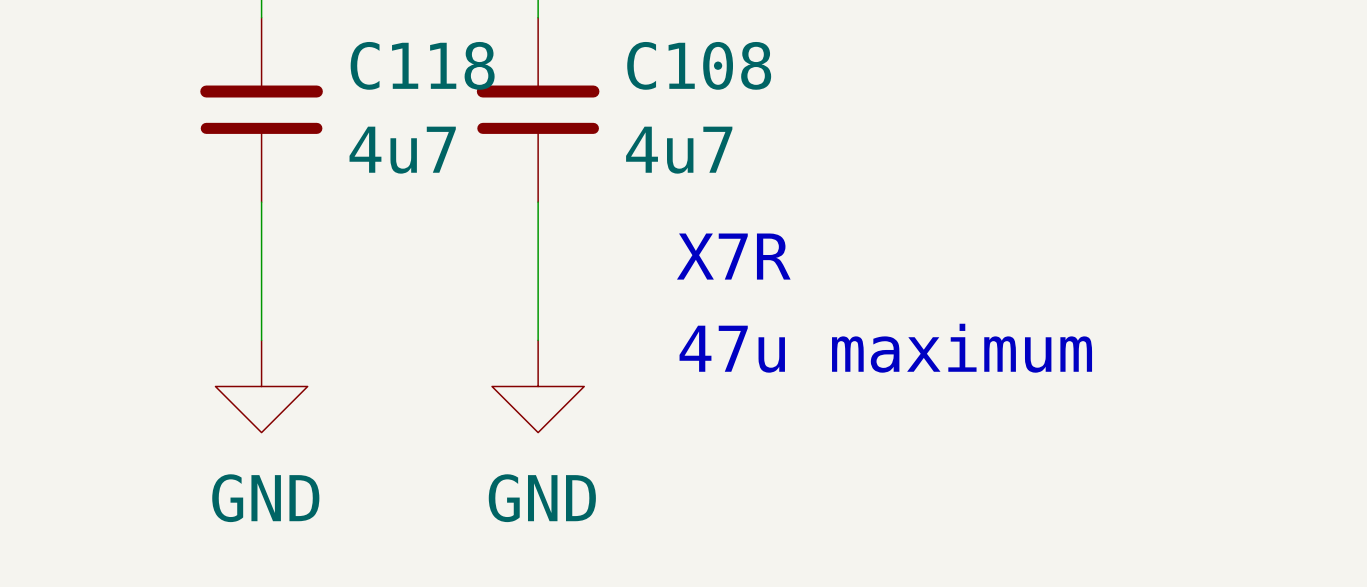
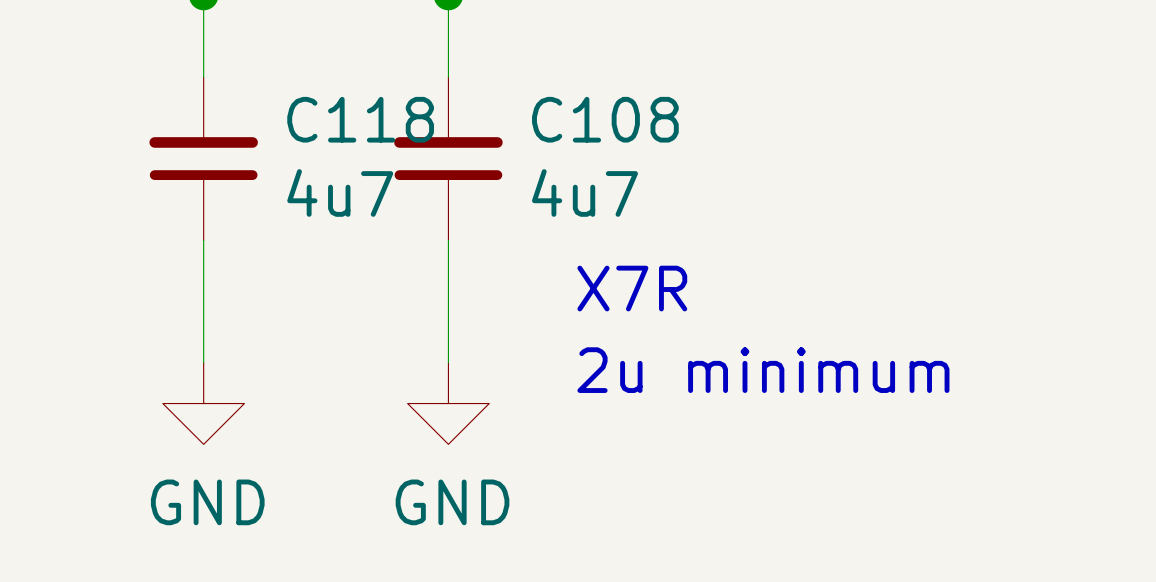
text: 47u maximum (885, 348) -> 2u minimum (763, 370)

